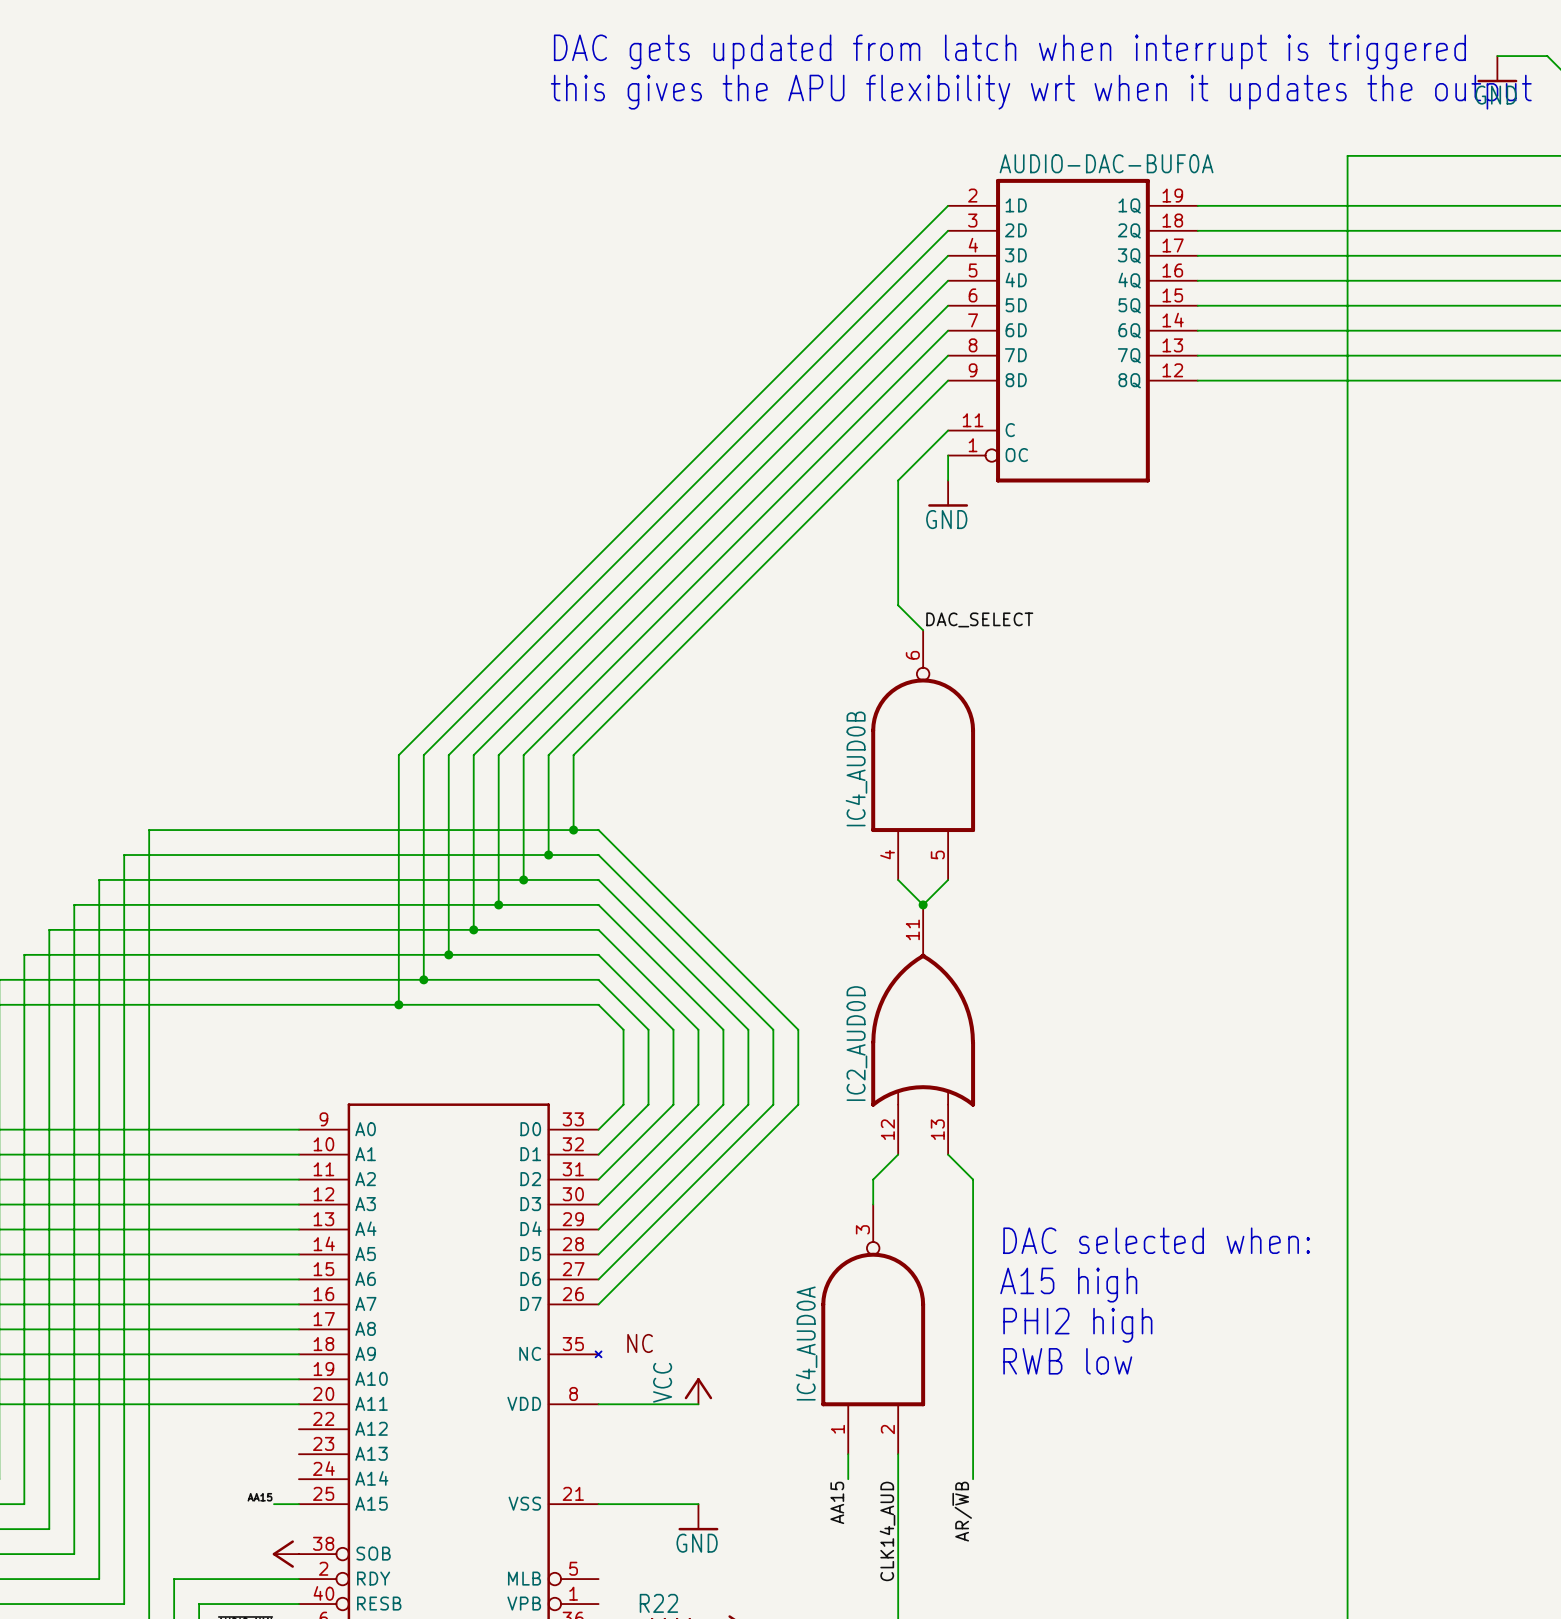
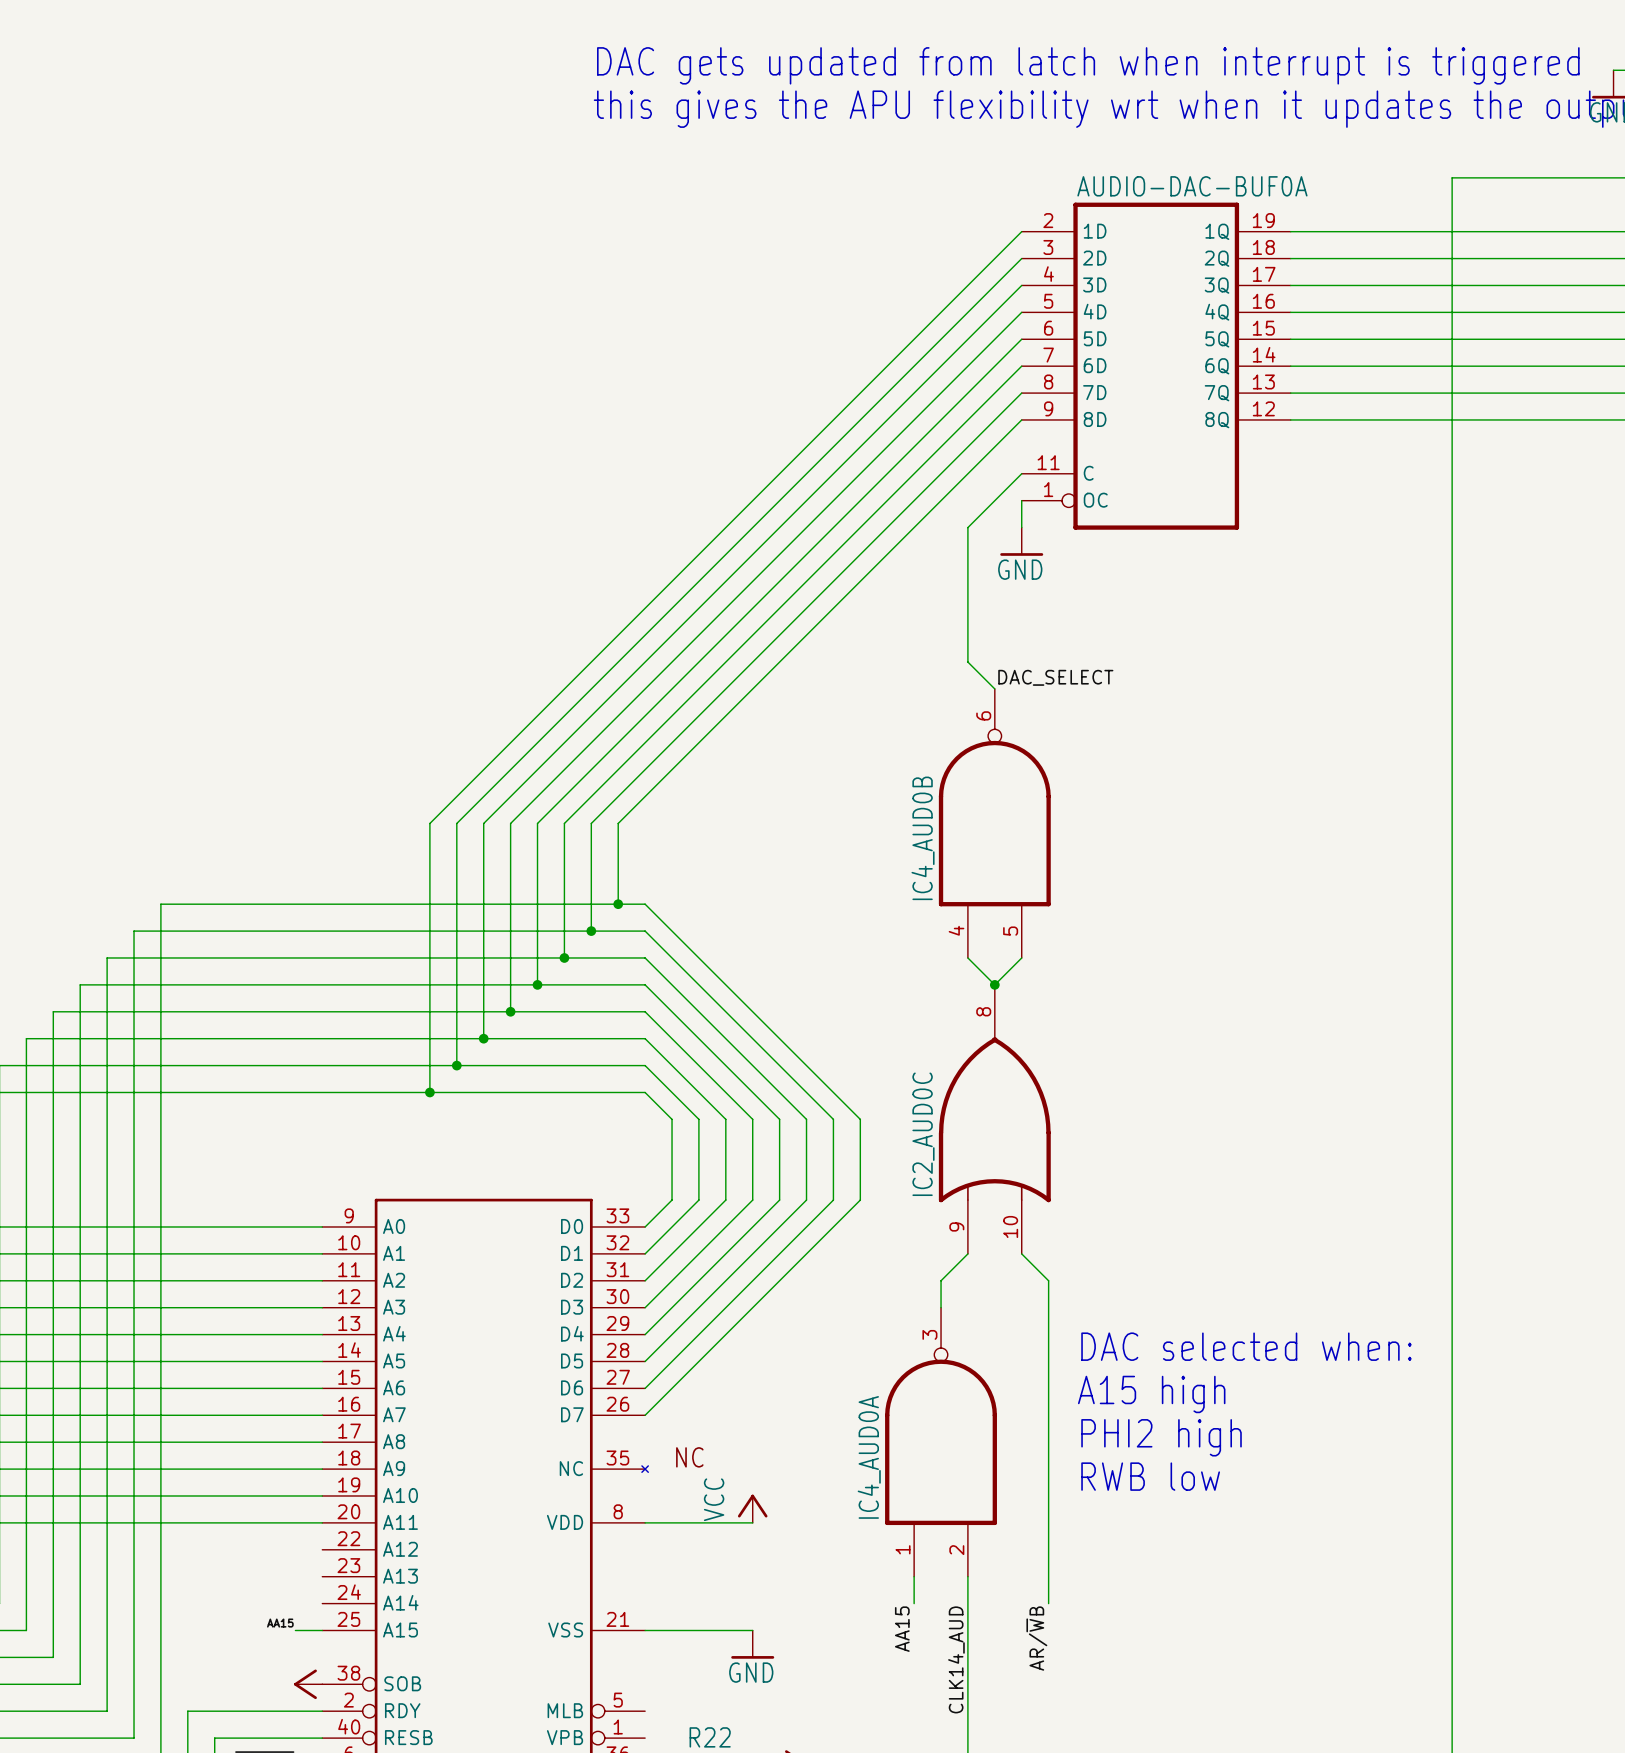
IC2_AUD0D pin number: 11 (912, 929) -> 8 (983, 1011)
IC2_AUD0D name: IC2_AUD0D (856, 1043) -> IC2_AUD0C (923, 1134)
IC2_AUD0D pin number: 12 (887, 1129) -> 9 (956, 1226)
IC2_AUD0D pin number: 13 (937, 1129) -> 10 (1010, 1226)

